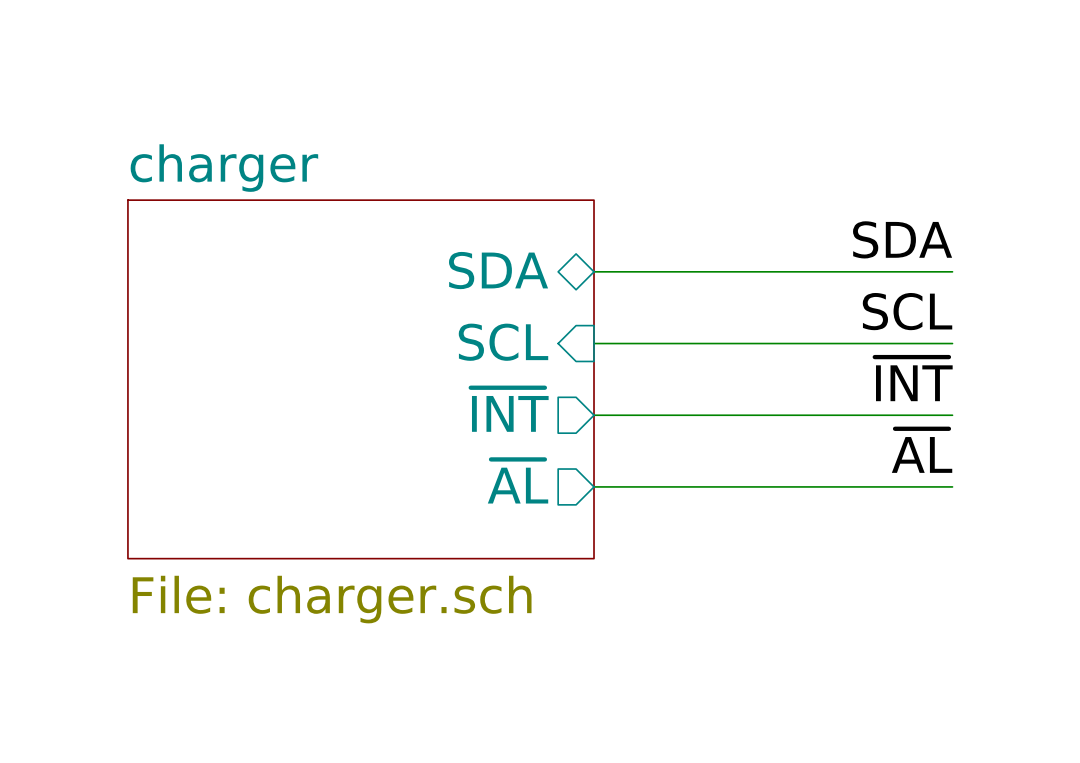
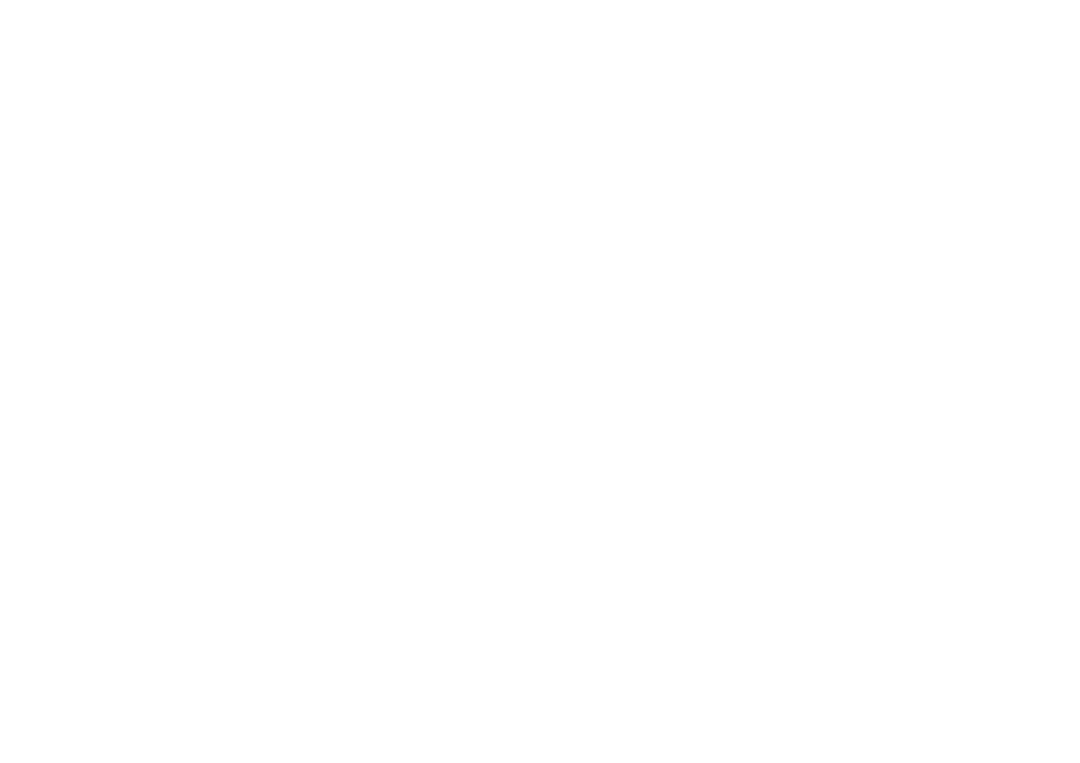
label: SDA (902, 239) -> none
sheet pin: SDA (498, 270) -> none
wire: (594, 271) (952, 271) -> none
label: SCL (907, 311) -> none
sheet pin: SCL (503, 342) -> none
wire: (594, 343) (952, 343) -> none
sheet charger: File: charger.sch (360, 379) -> none
label: ~{INT} (913, 379) -> none
sheet pin: ~{INT} (509, 409) -> none
wire: (594, 415) (952, 415) -> none
label: ~{AL} (922, 450) -> none
sheet pin: ~{AL} (518, 481) -> none
wire: (594, 486) (952, 486) -> none

